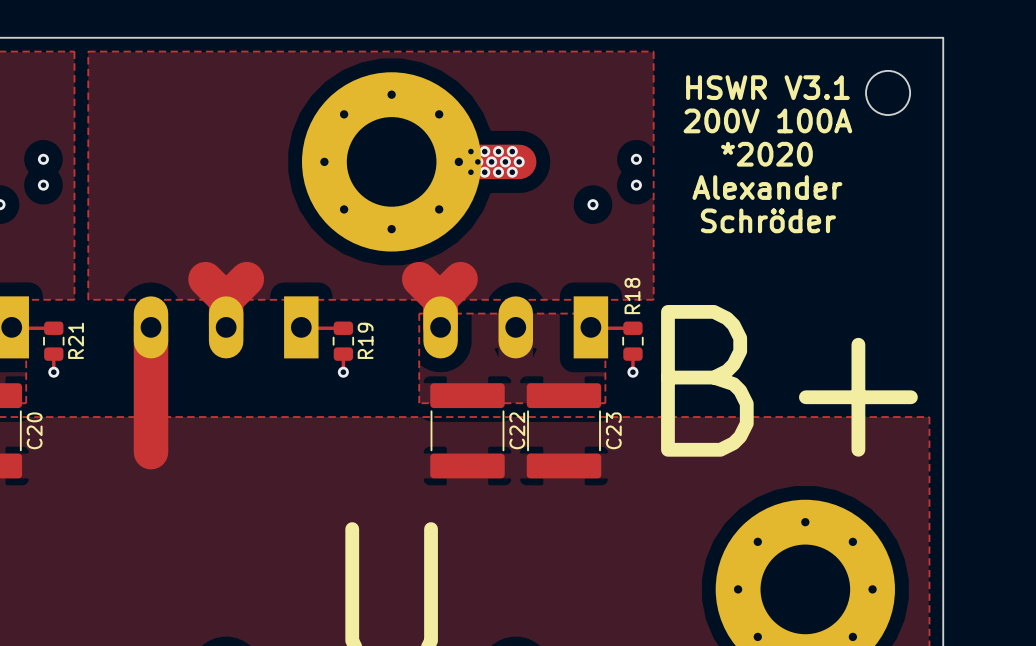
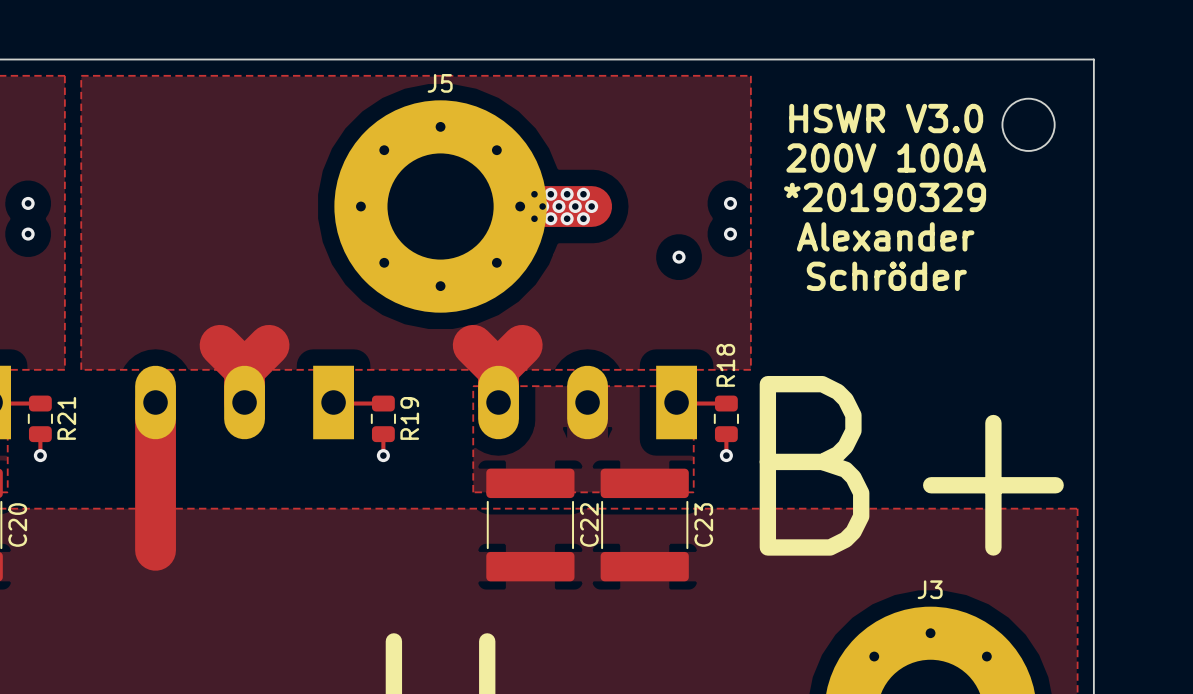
J5 name: none -> J5 (440, 83)
text: HSWR V3.1 (767, 87) -> HSWR V3.0 (886, 118)
text: *2020 (766, 154) -> *20190329 (885, 197)
J3 name: none -> J3 (930, 589)

